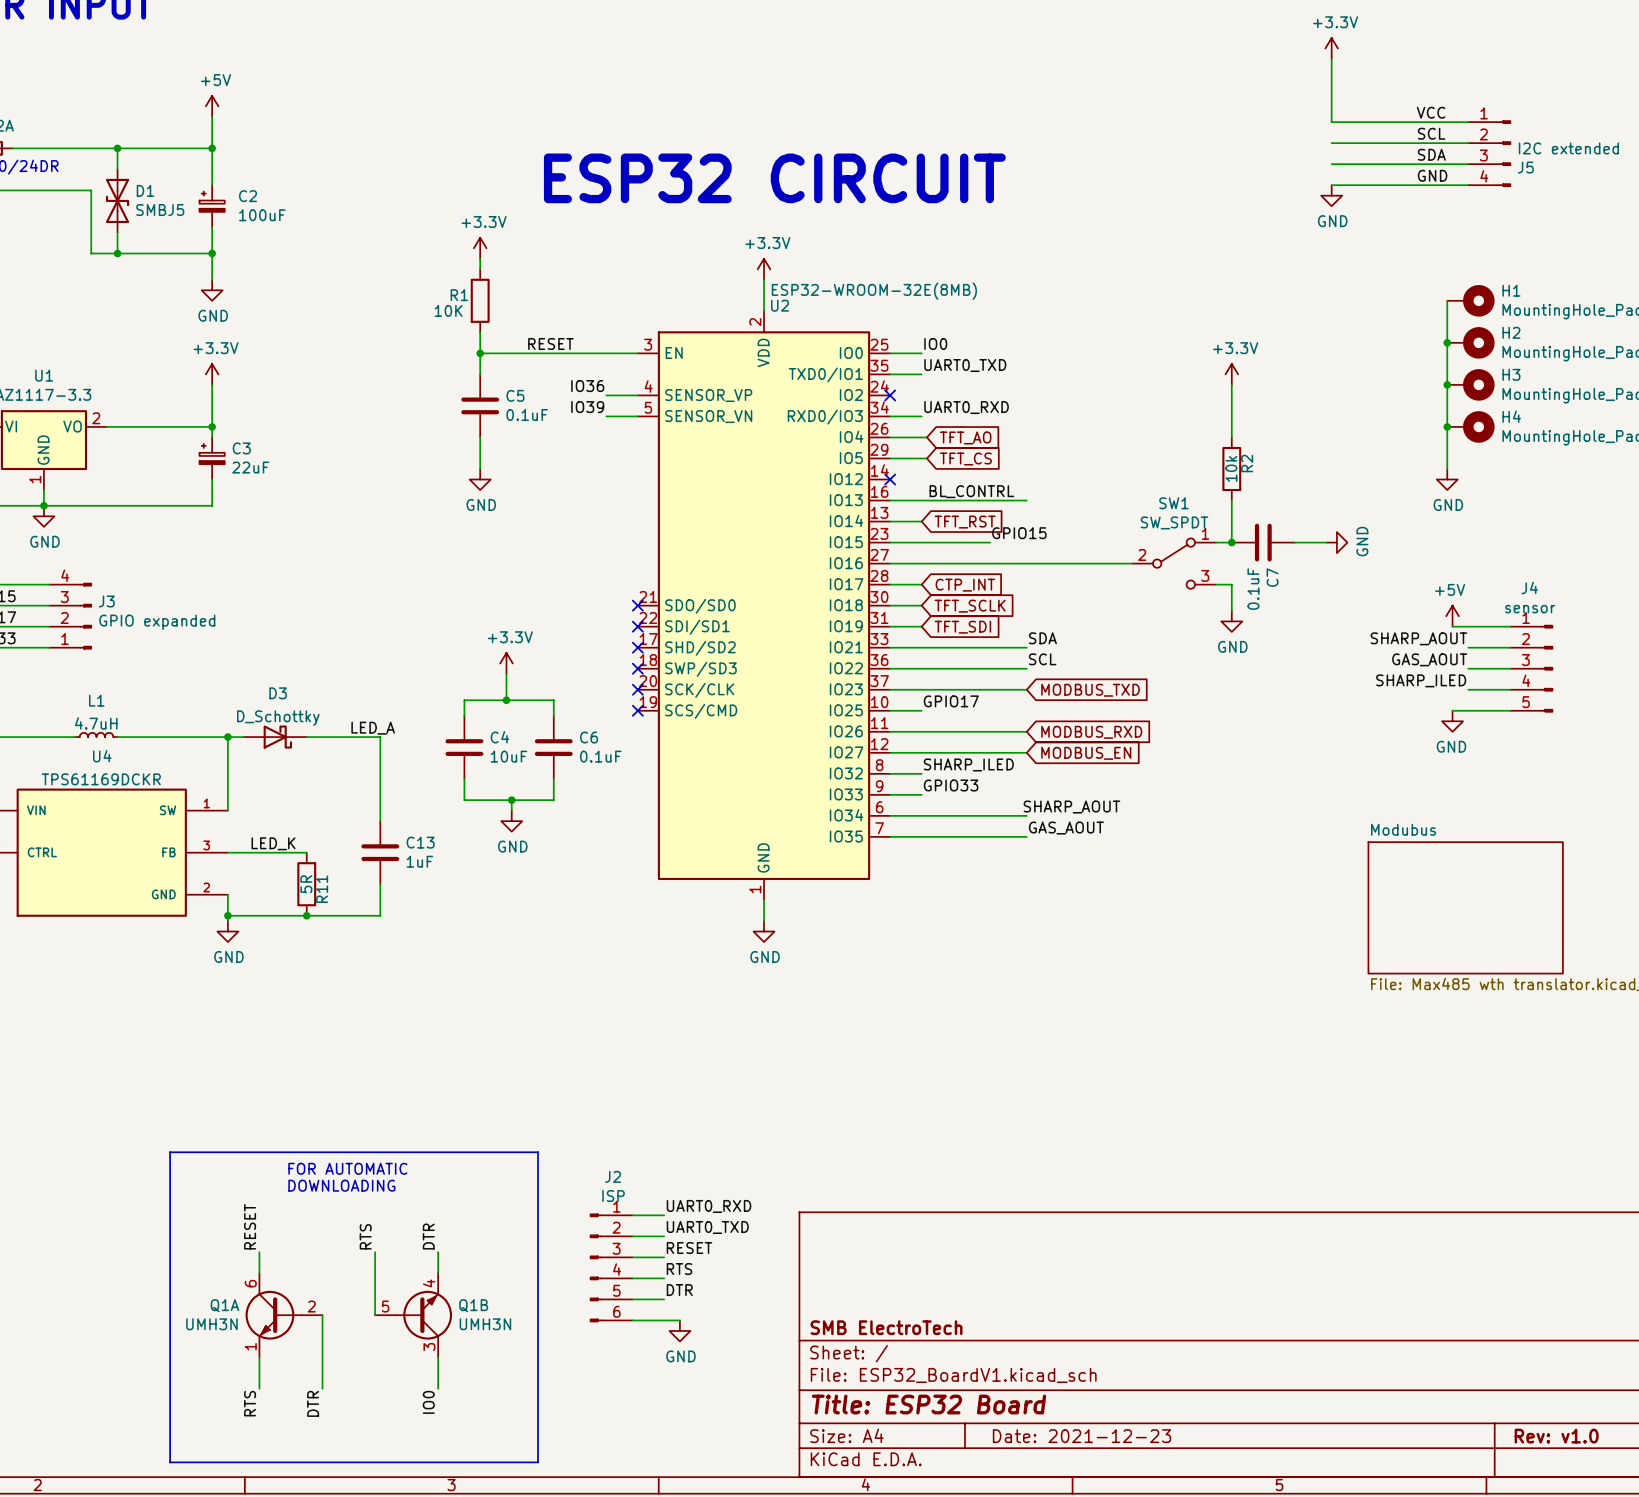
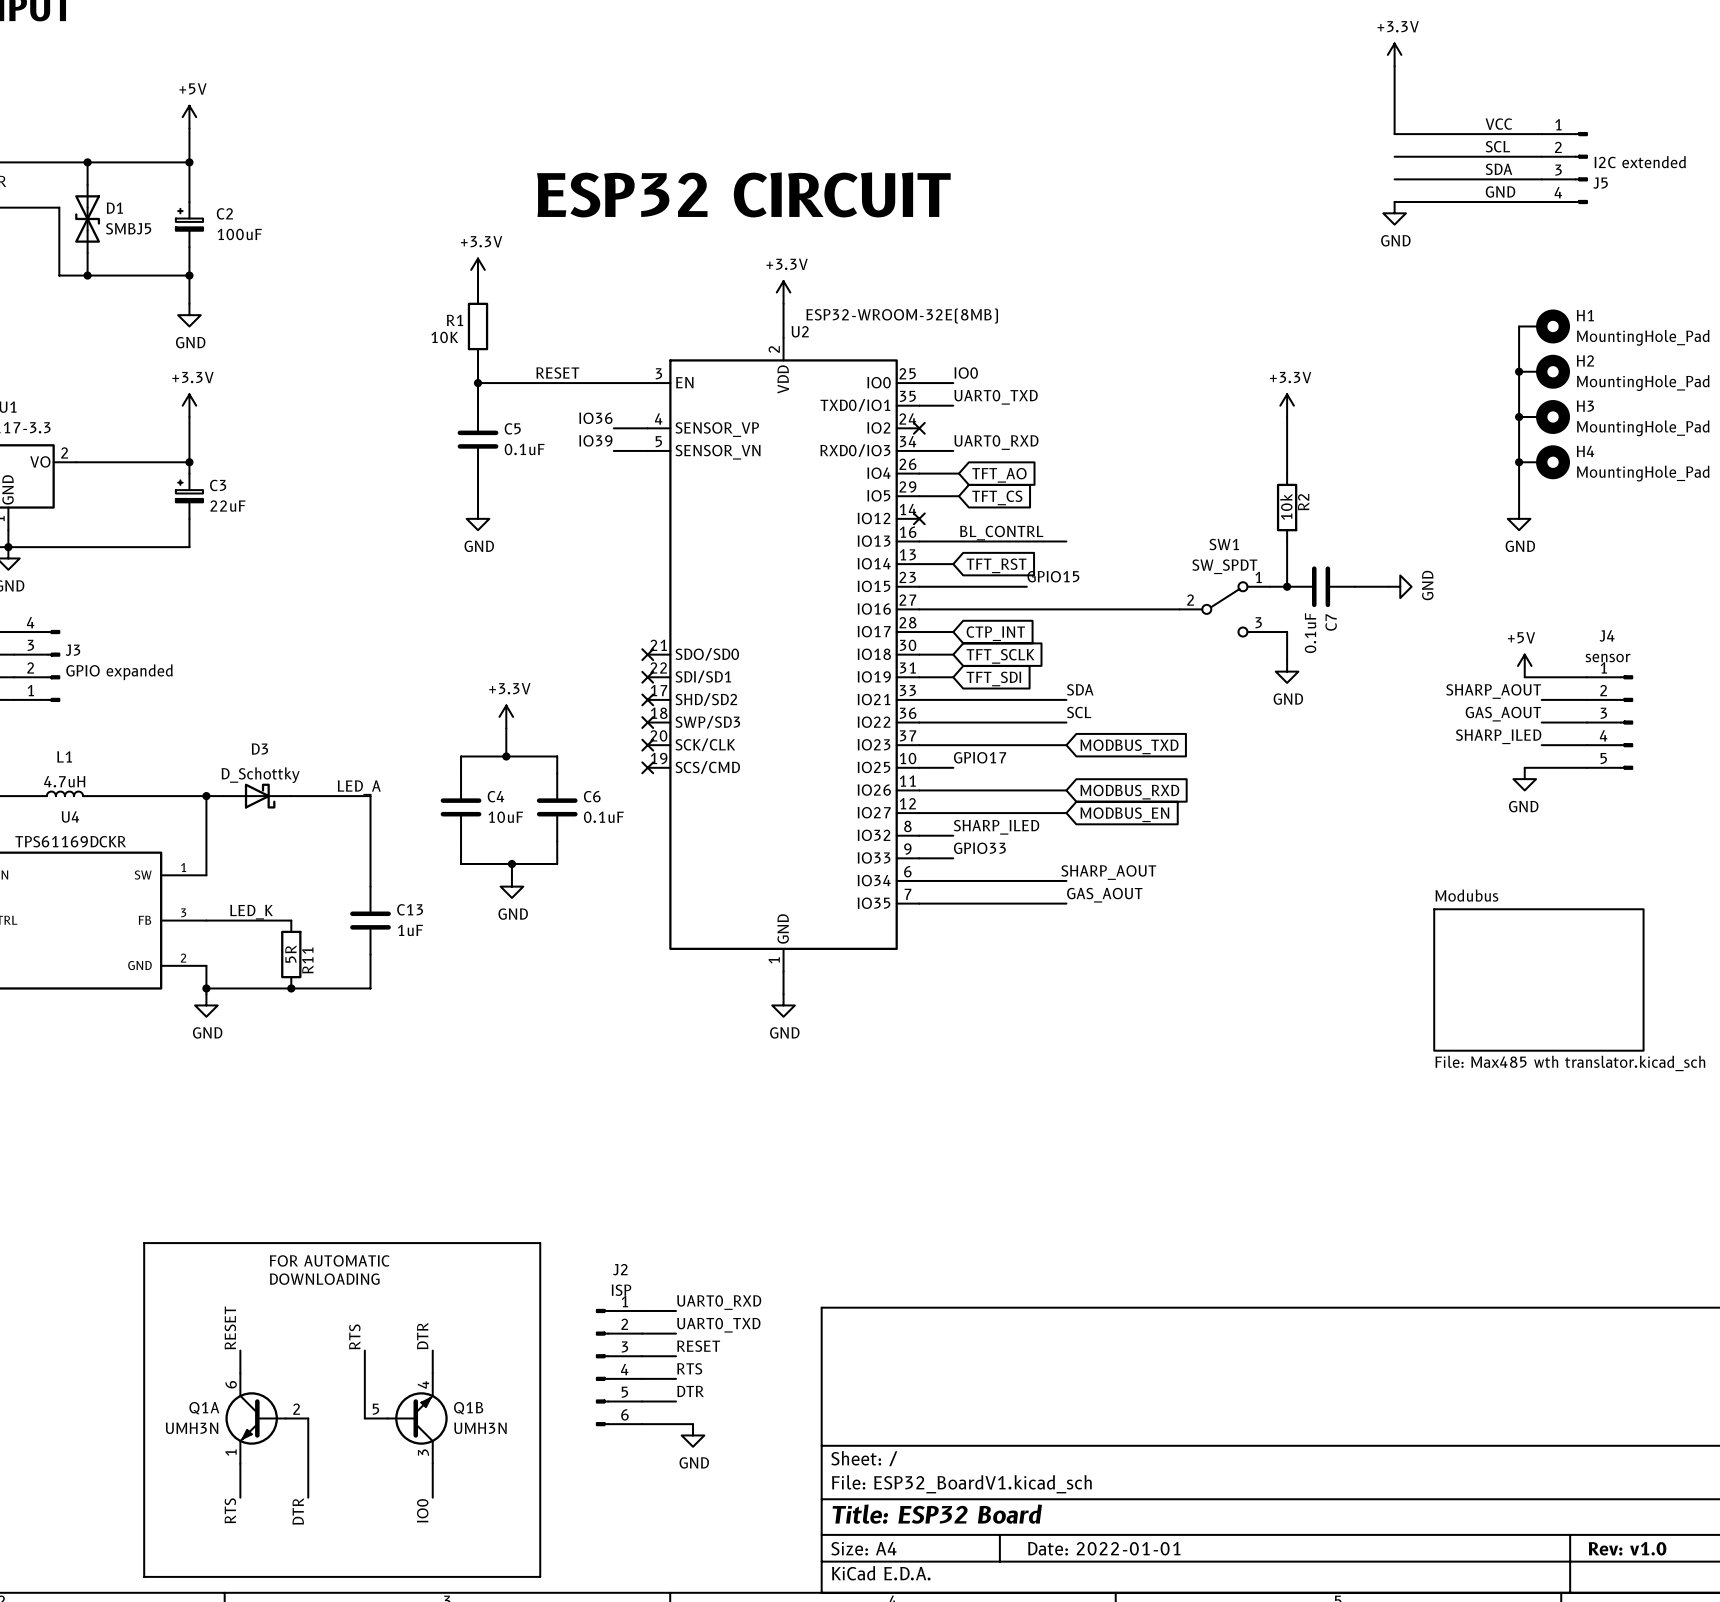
title block: SMB ElectroTech (886, 1327) -> none
title block: Date: 2021-12-23 (1081, 1436) -> Date: 2022-01-01 (1104, 1548)

